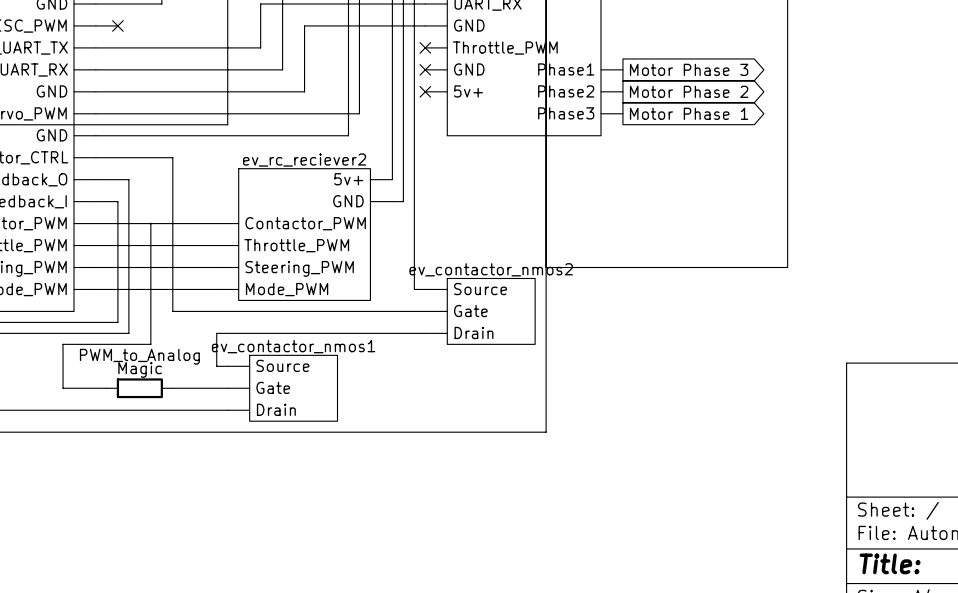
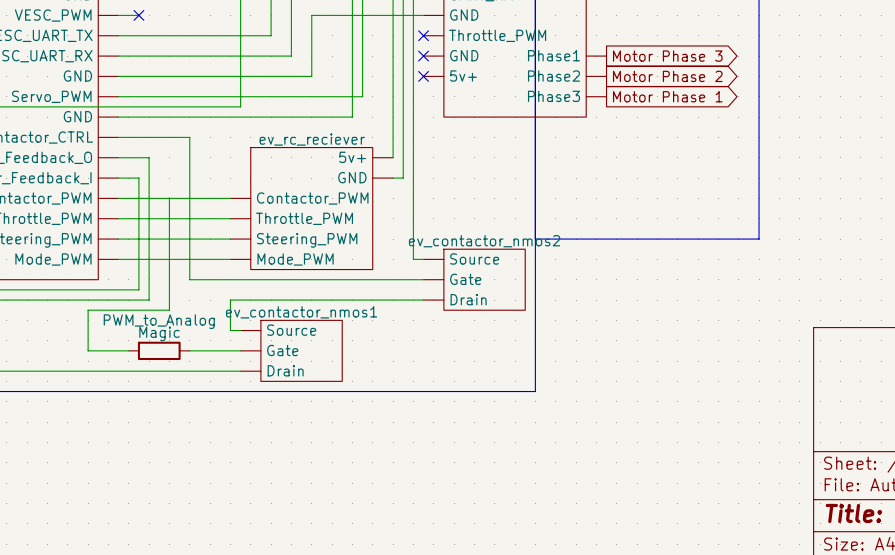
ev_rc_reciever2 name: ev_rc_reciever2 (304, 160) -> ev_rc_reciever (312, 139)

